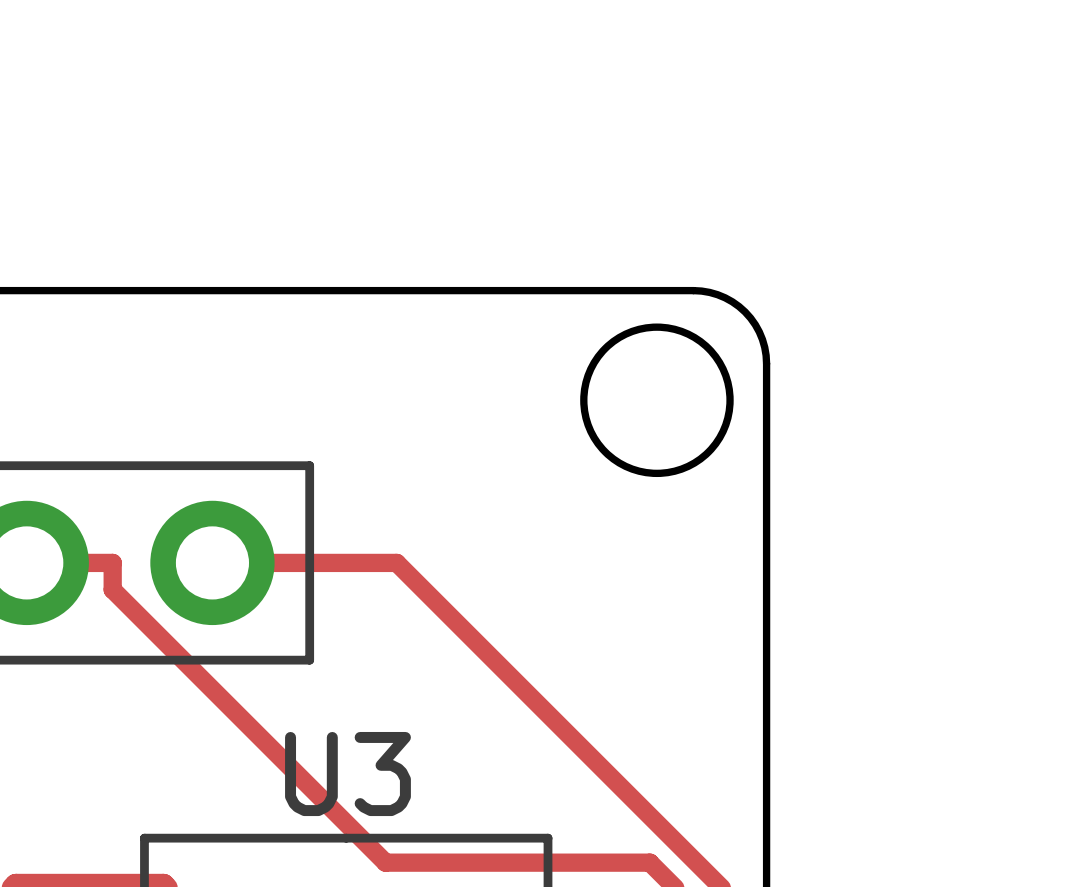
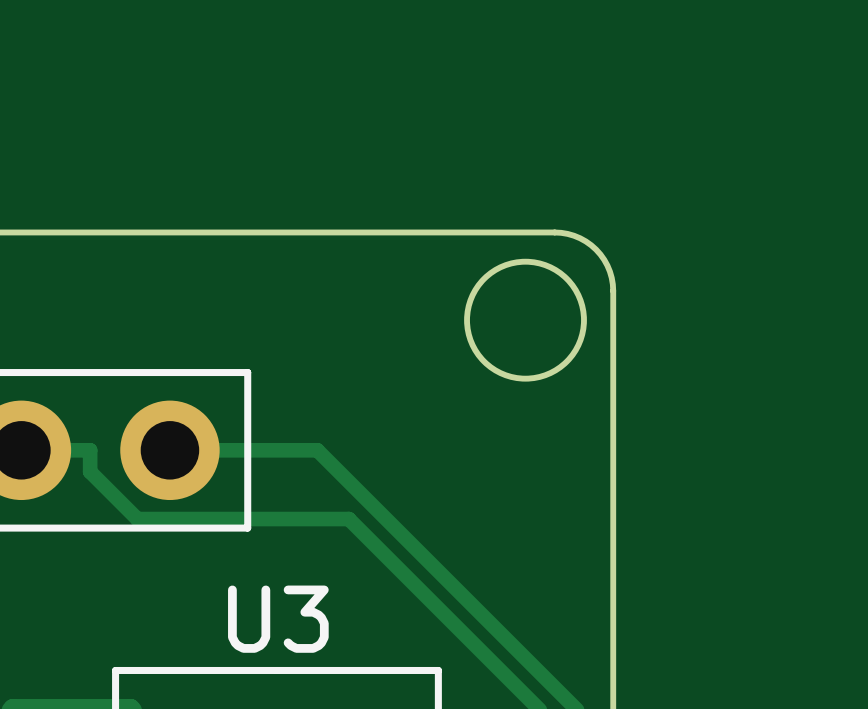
track: (171, 648) (385, 862) (649, 862) -> (137, 519) (348, 519) (519, 690)

